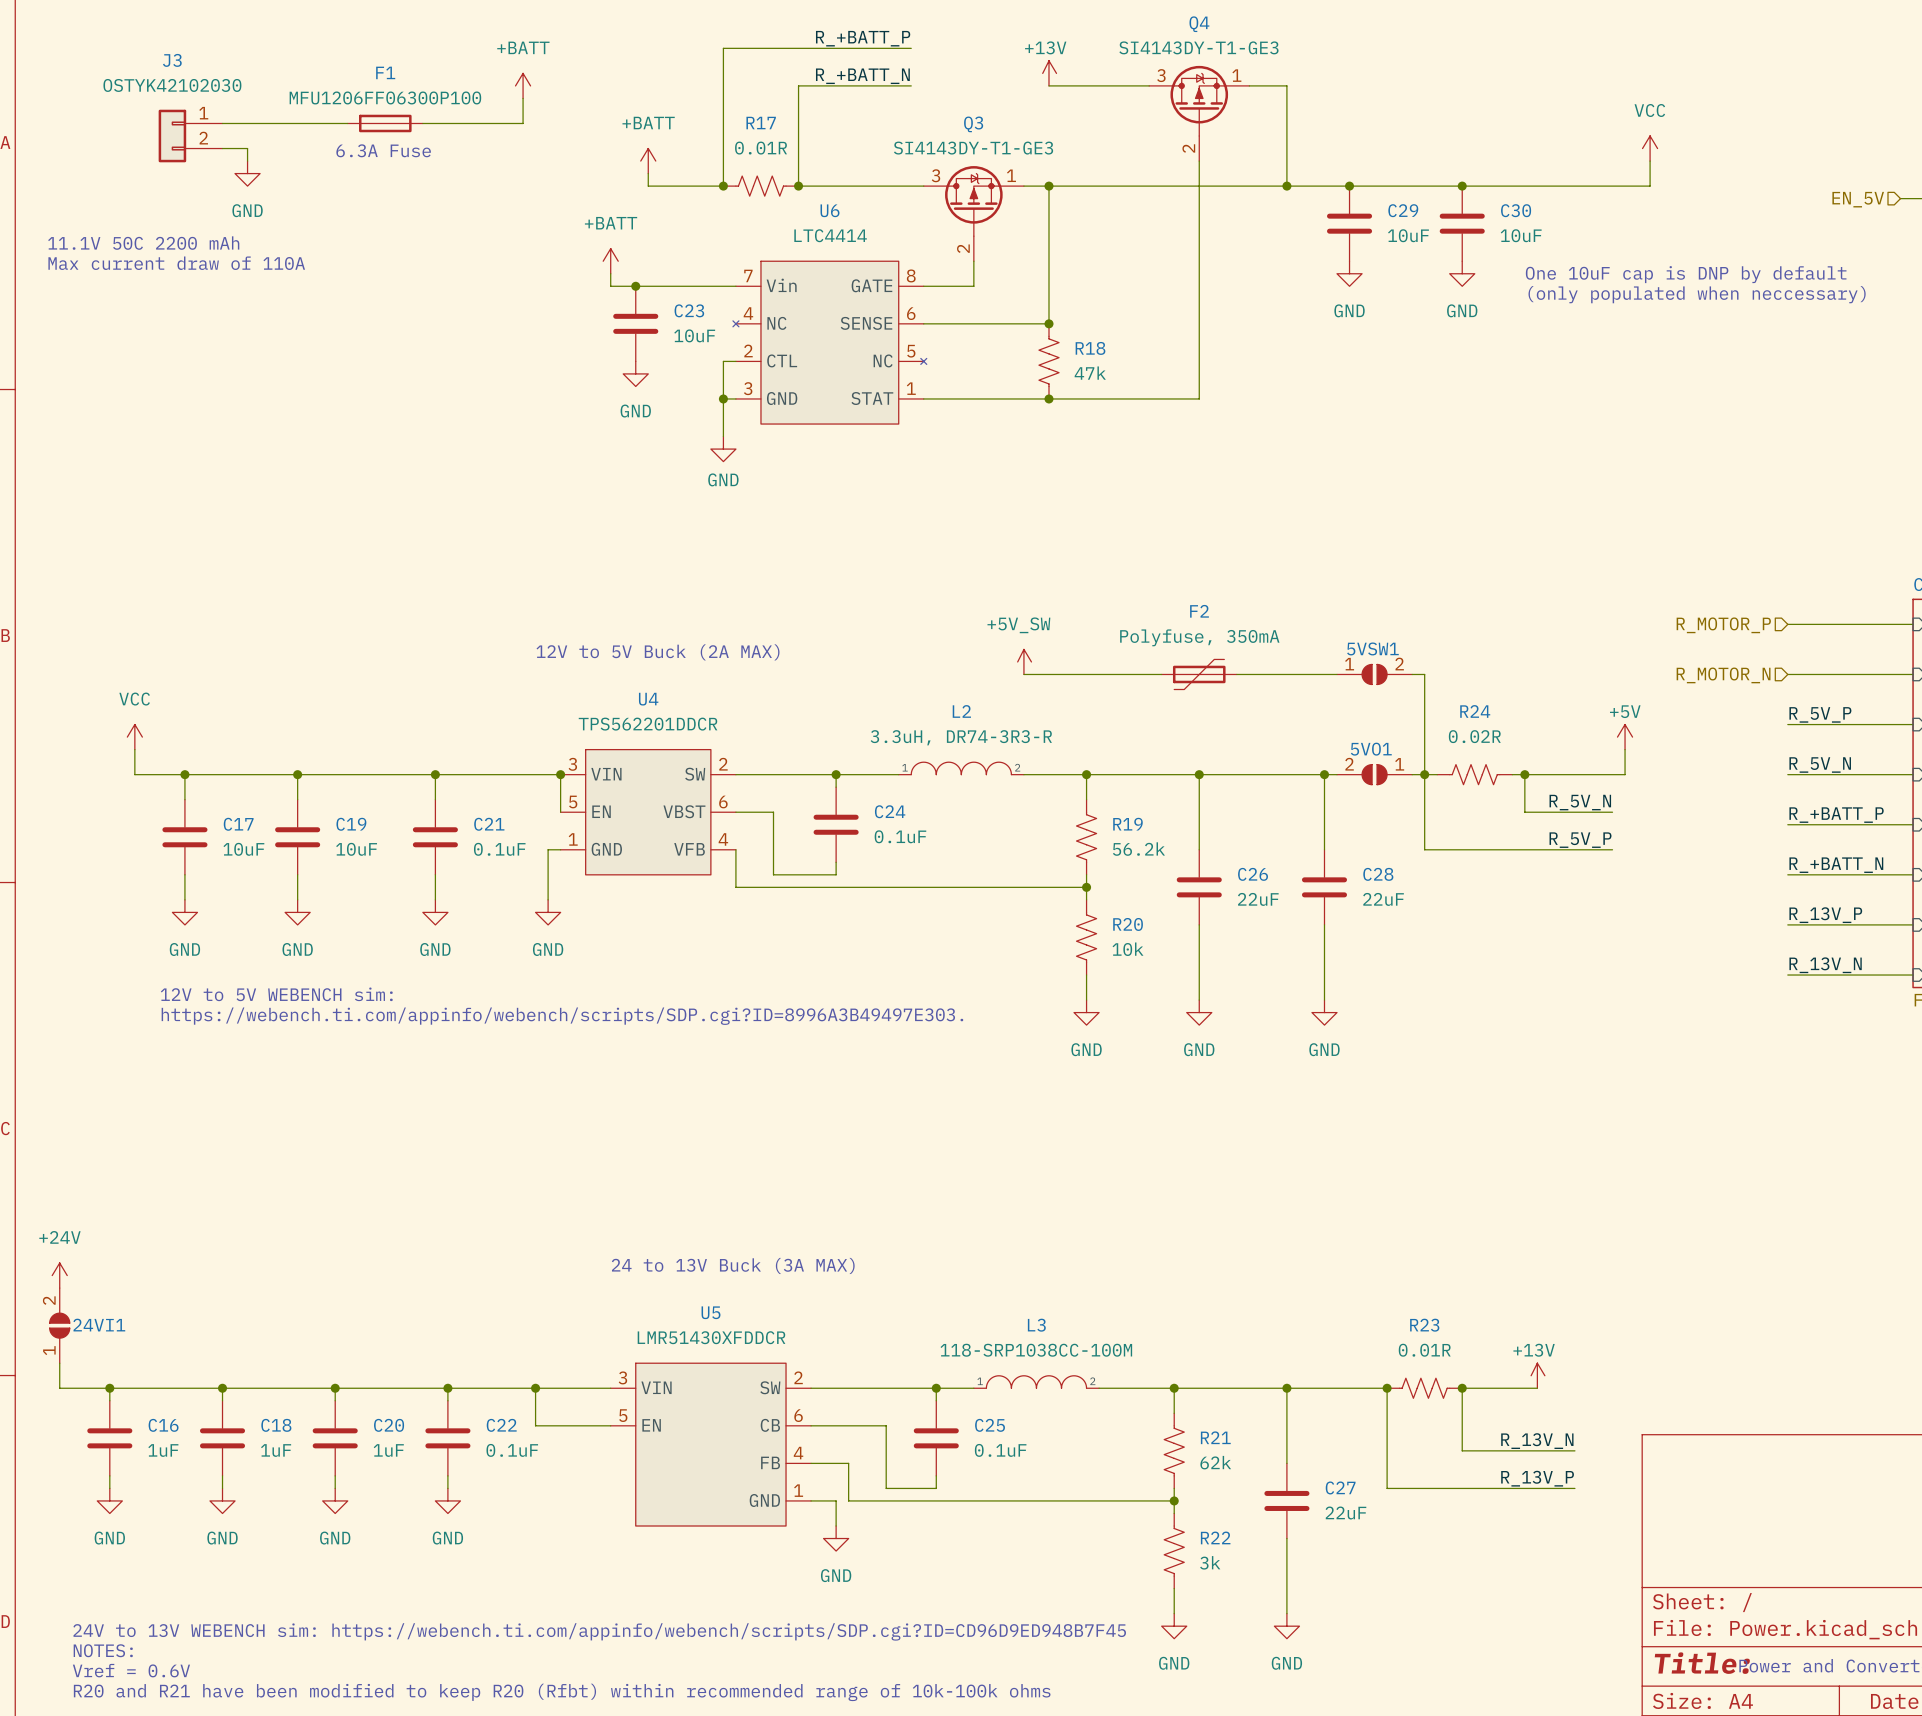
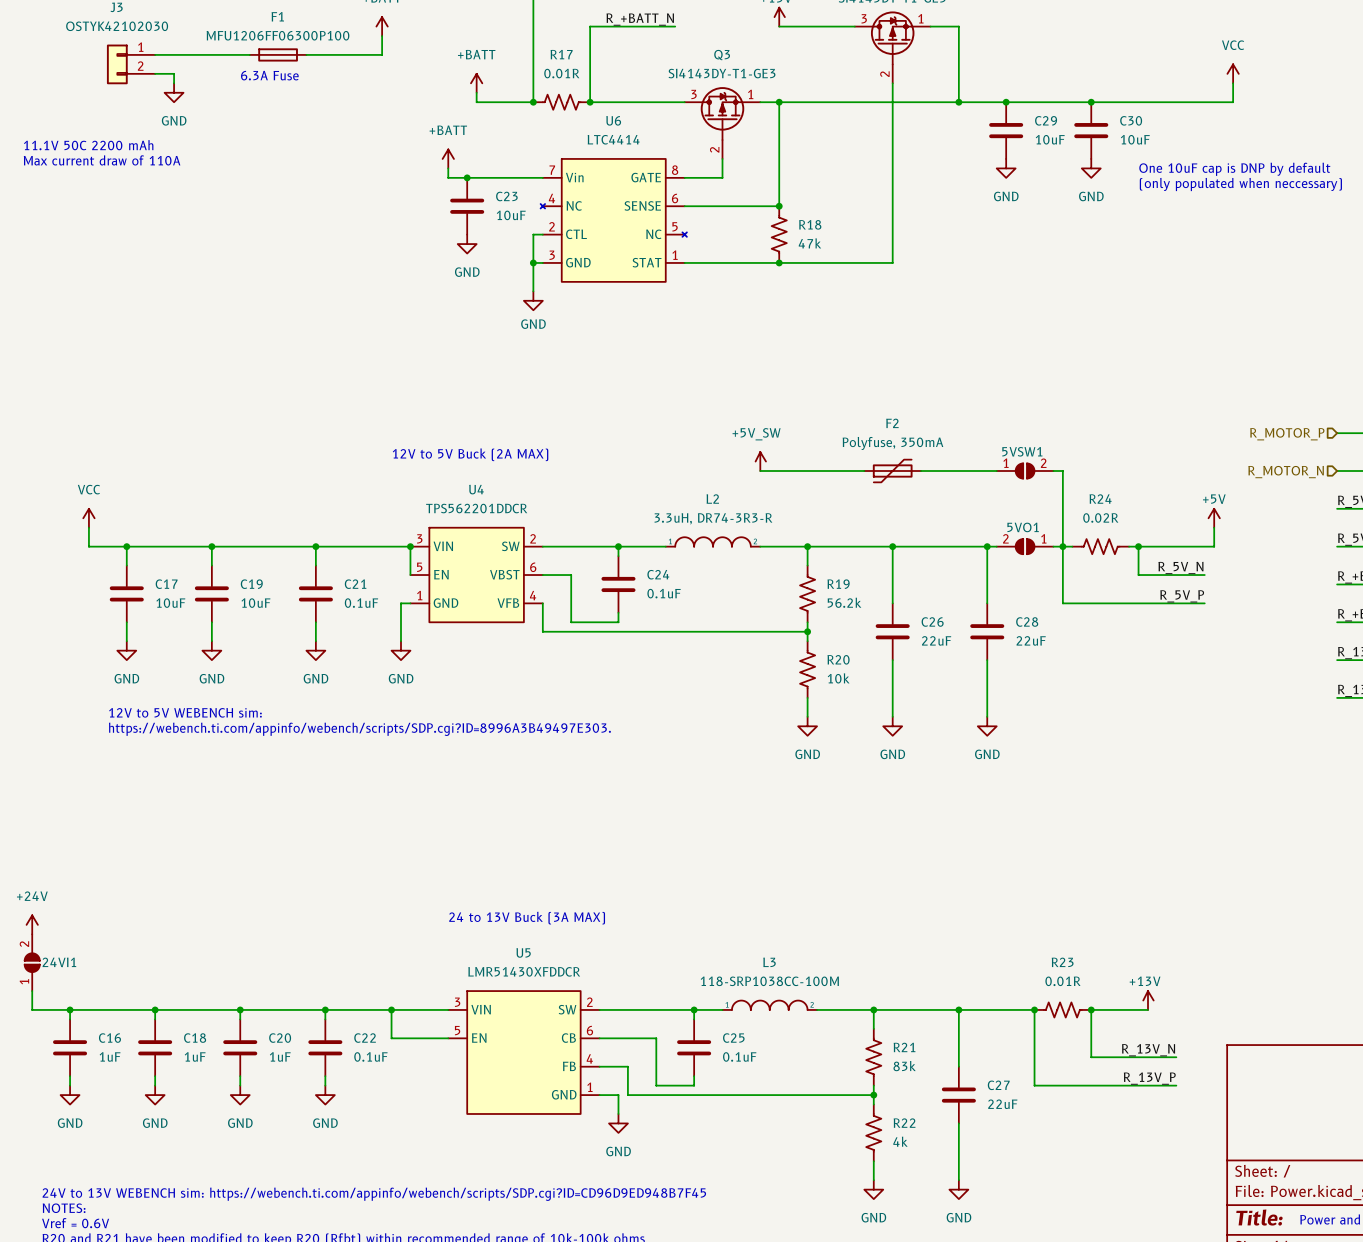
R21 value: 62k (1215, 1462) -> 83k (904, 1066)
R22 value: 3k (1210, 1562) -> 4k (900, 1141)

